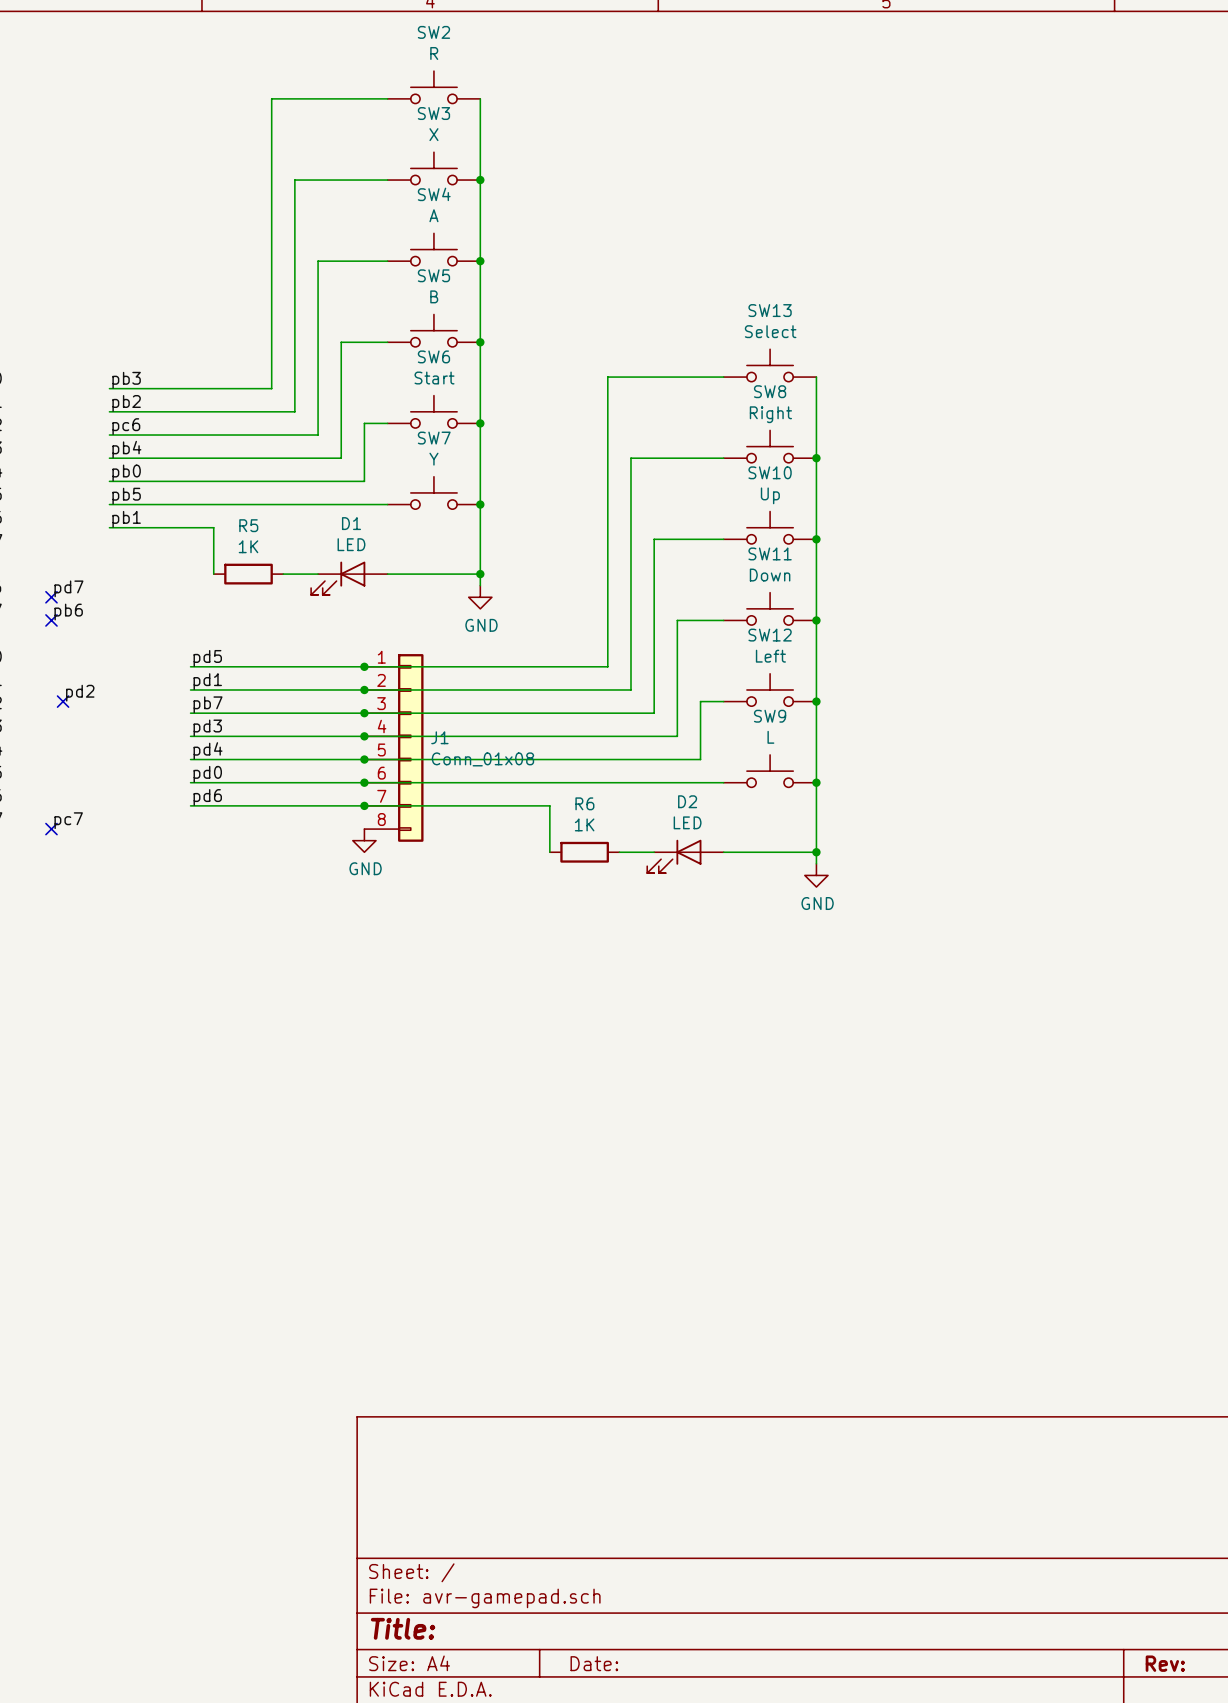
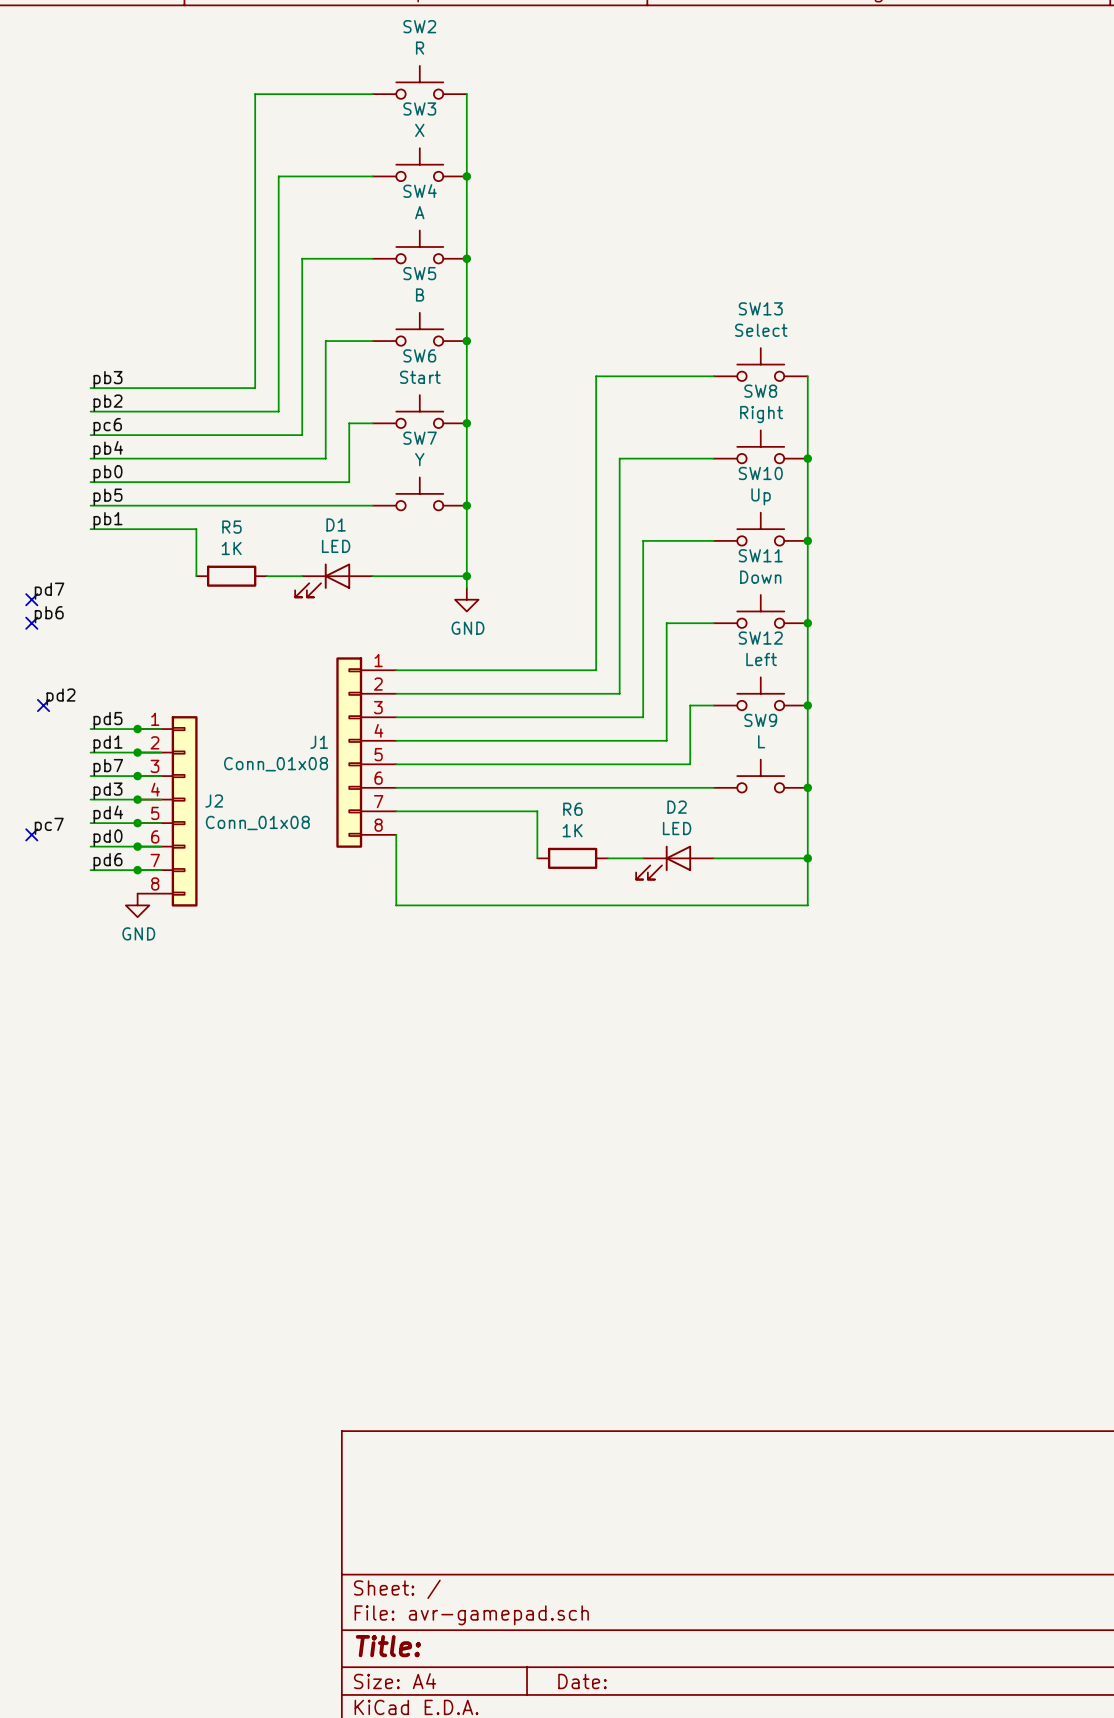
label position: pd5 (207, 658) -> pd5 (108, 720)
wire: (190, 666) (410, 666) -> none
junction: (364, 666) -> none
label position: pd1 (207, 681) -> pd1 (108, 744)
wire: (190, 689) (410, 689) -> none
junction: (364, 689) -> none
label position: pb7 (208, 704) -> pb7 (108, 767)
wire: (190, 713) (410, 713) -> none
junction: (364, 713) -> none
wire: none -> (90, 729) (161, 729)
junction: none -> (137, 729)
label position: pd3 (207, 727) -> pd3 (108, 791)
wire: (190, 736) (410, 736) -> none
junction: (364, 736) -> none
wire: none -> (90, 752) (161, 752)
junction: none -> (137, 752)
J1 flip: as is (410, 747) -> left-right (349, 752)
label position: pd4 (208, 750) -> pd4 (108, 814)
wire: (190, 759) (410, 759) -> none
junction: (364, 759) -> none
wire: none -> (90, 776) (161, 776)
junction: none -> (137, 776)
label position: pd0 (207, 774) -> pd0 (108, 838)
wire: (190, 782) (410, 782) -> none
junction: (364, 782) -> none
wire: none -> (90, 799) (161, 799)
junction: none -> (137, 799)
label position: pd6 (207, 797) -> pd6 (108, 861)
J2: none -> Conn_01x08 (167, 811)
wire: (190, 805) (410, 805) -> none
junction: (364, 805) -> none
wire: none -> (90, 823) (161, 823)
junction: none -> (137, 823)
wire: none -> (396, 834) (396, 905) (807, 905) (807, 870)
wire: none -> (90, 846) (161, 846)
junction: none -> (137, 846)
power symbol position: GND (364, 840) -> GND (137, 905)
wire: none -> (90, 870) (161, 870)
junction: none -> (137, 870)
power symbol: GND (816, 875) -> none

